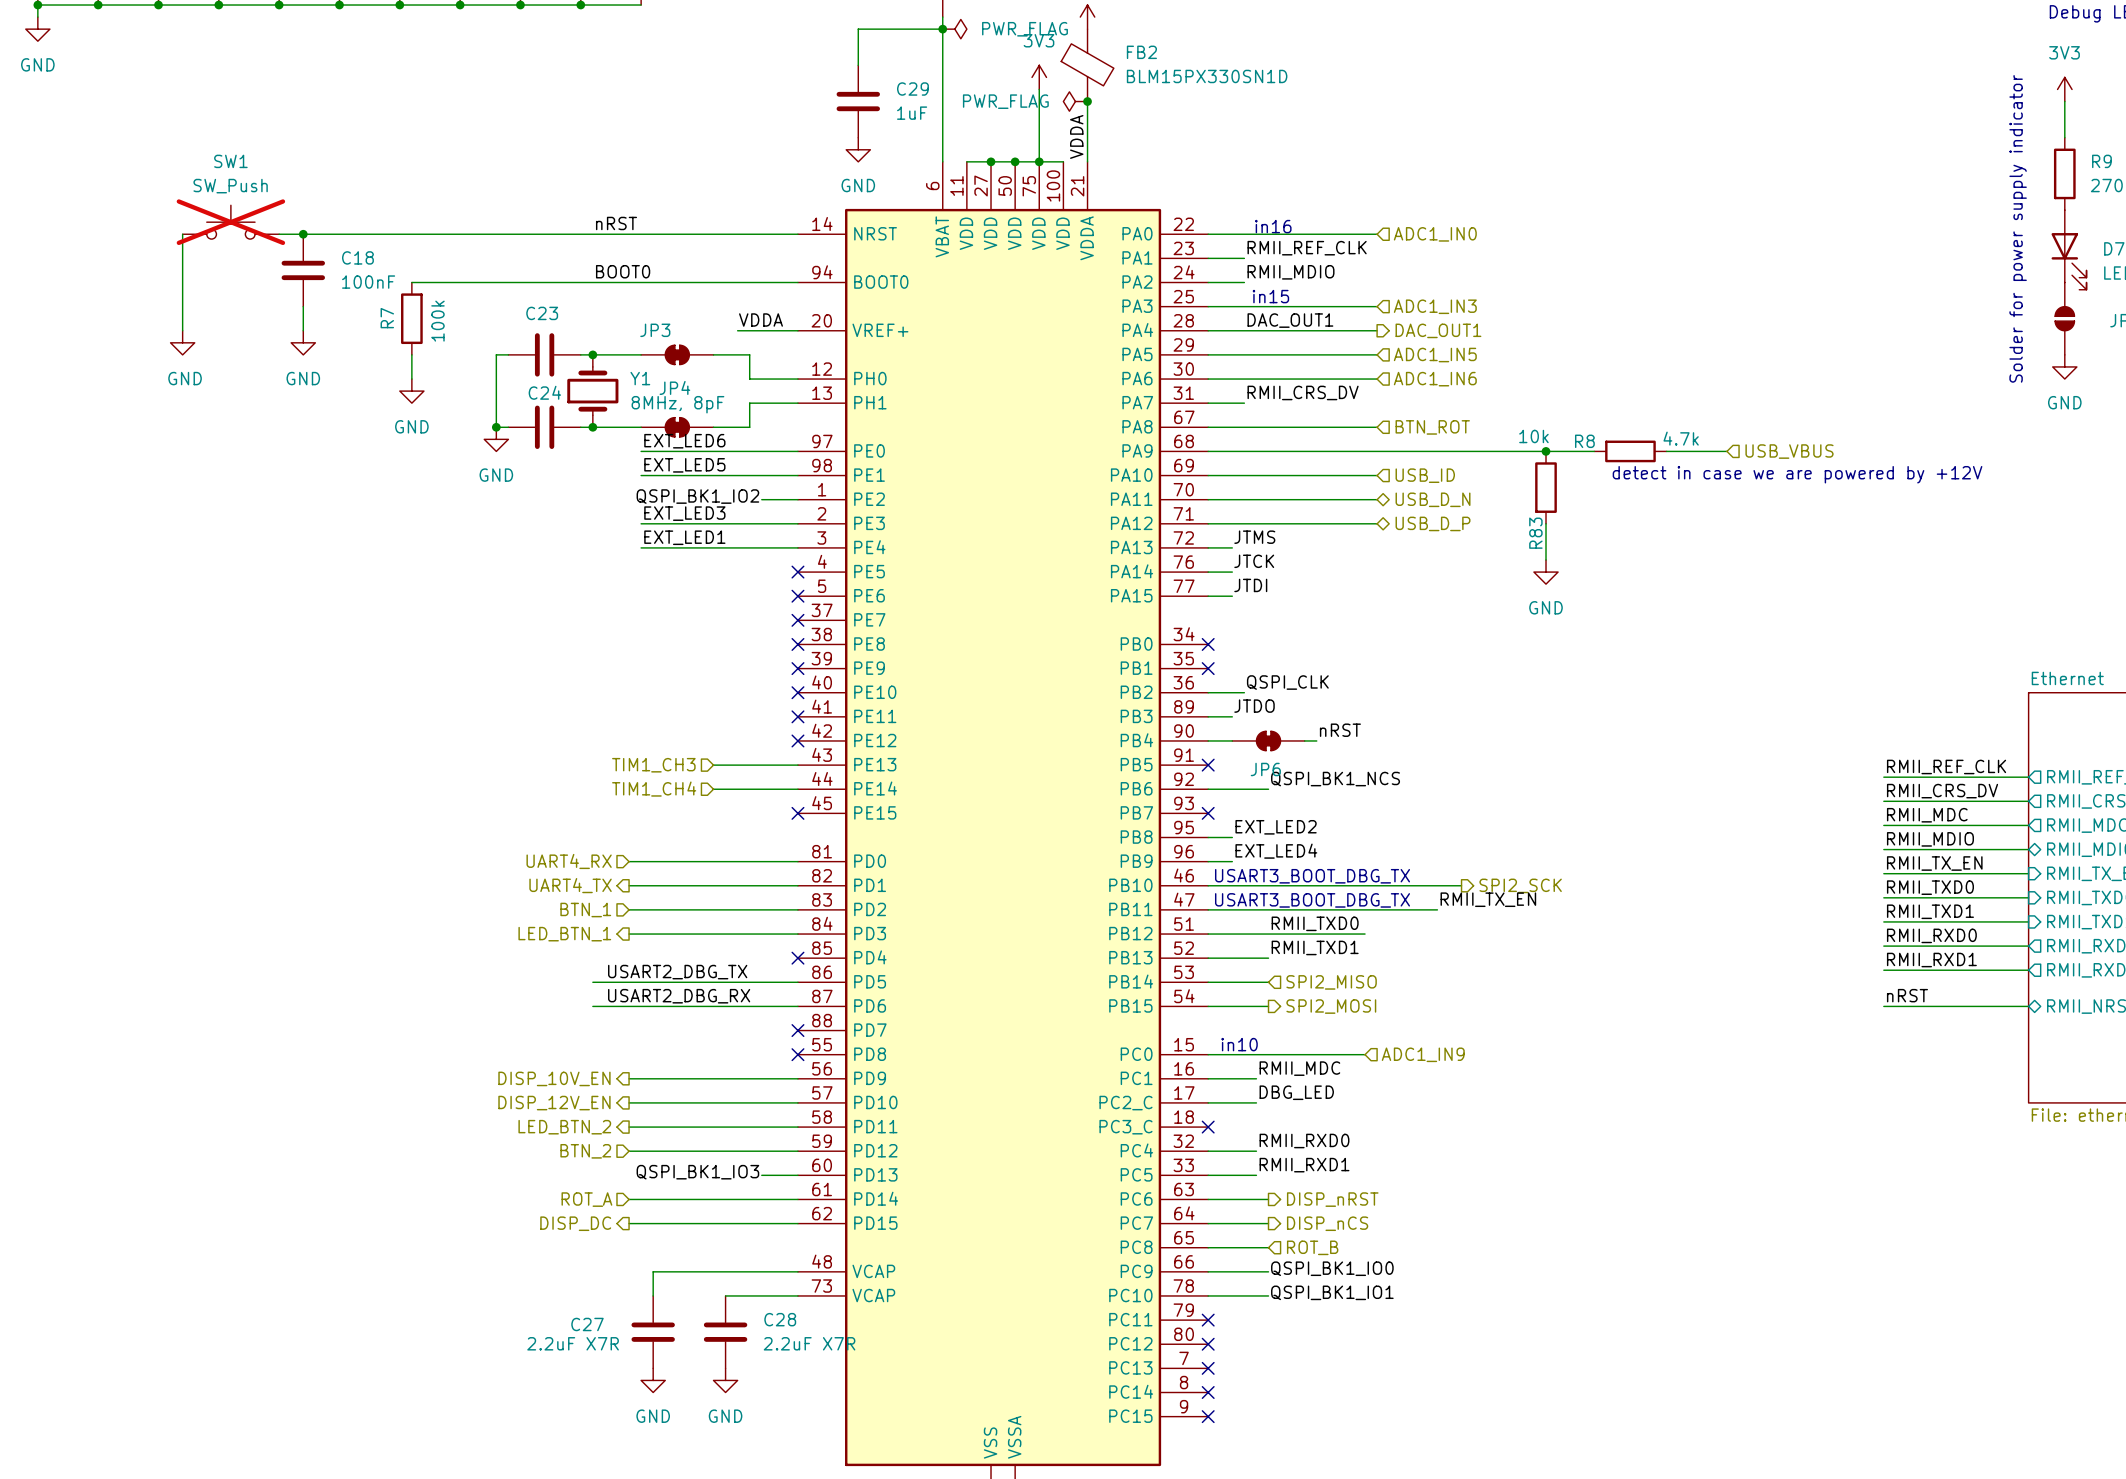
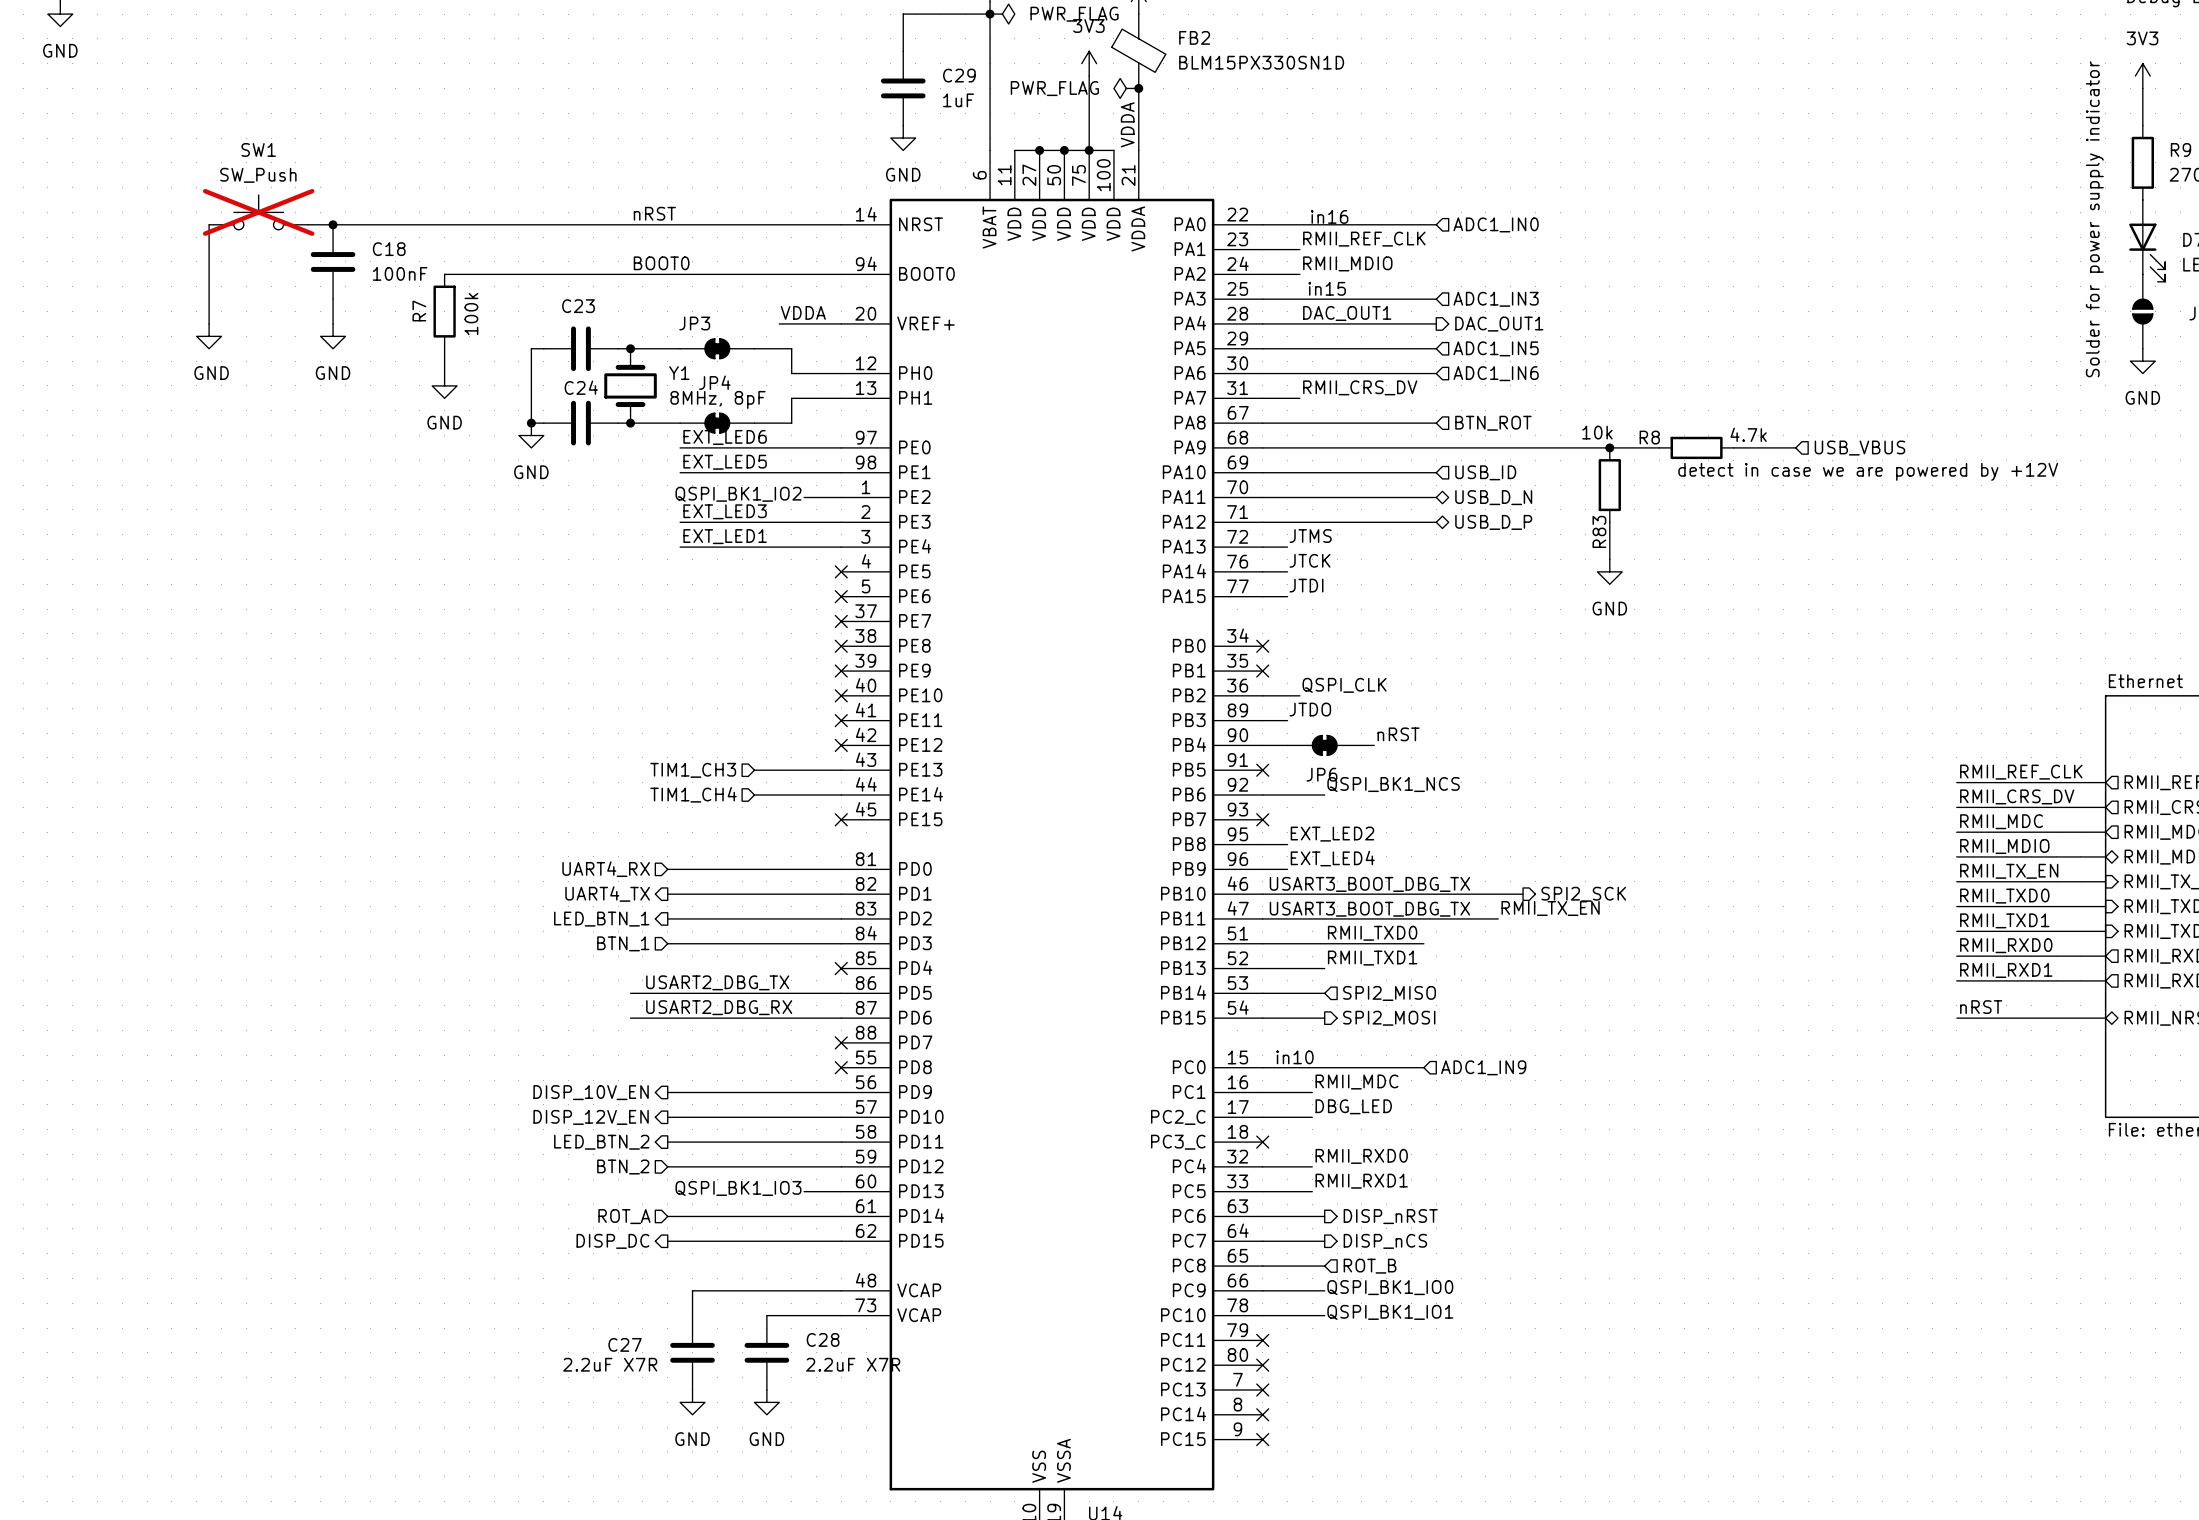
hierarchical label shape: input (585, 910) -> output (601, 919)
hierarchical label: BTN_1 (585, 910) -> LED_BTN_1 (601, 919)
hierarchical label shape: output (564, 934) -> input (623, 943)
hierarchical label: LED_BTN_1 (564, 934) -> BTN_1 (623, 943)

